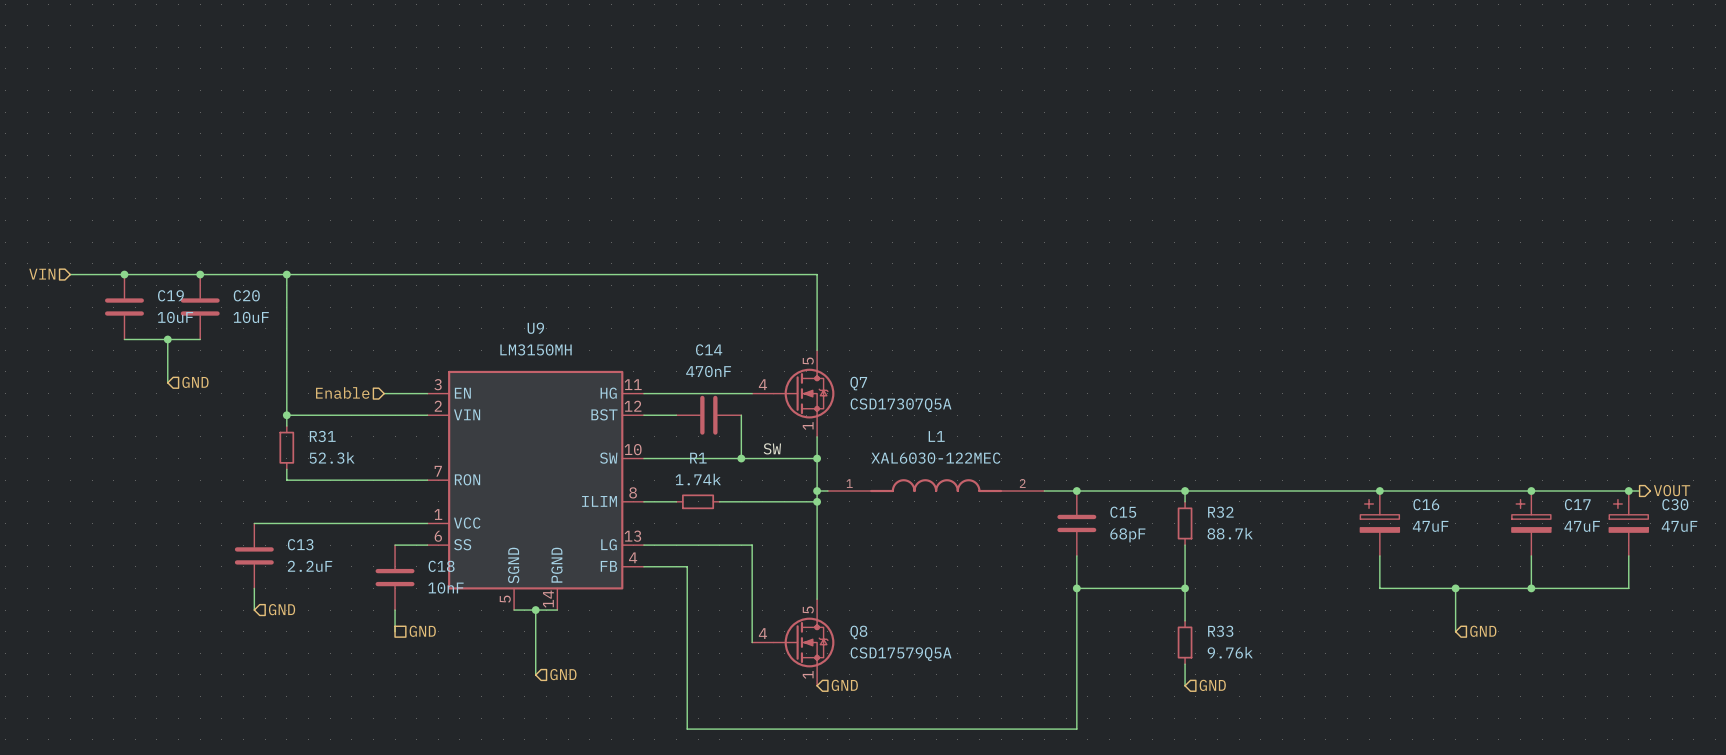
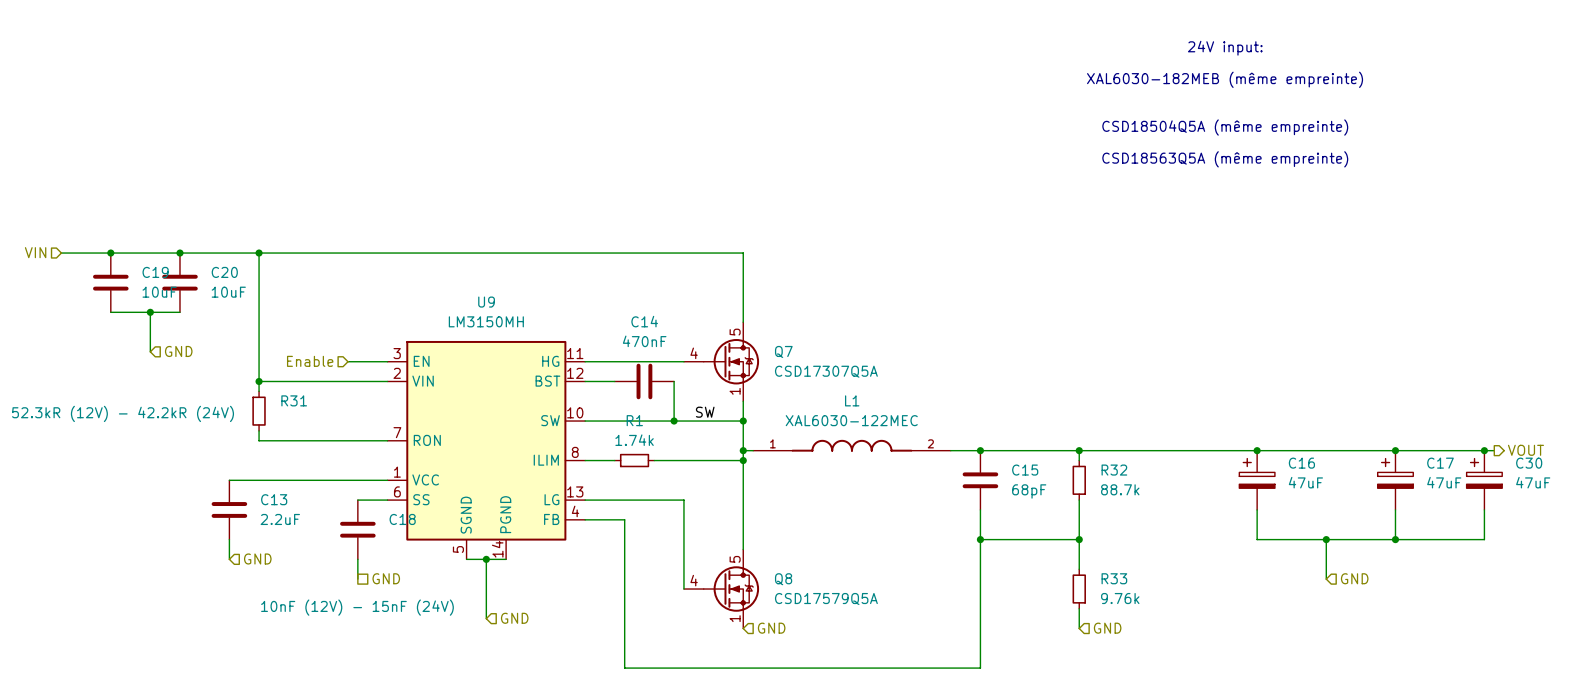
text: none -> 24V input: (1225, 48)
text: none -> XAL6030-182MEB (même empreinte) (1225, 79)
text: none -> CSD18504Q5A (même empreinte) (1225, 127)
text: none -> CSD18563Q5A (même empreinte) (1225, 159)
R31 value: 52.3k (332, 457) -> 52.3kR (12V) - 42.2kR (24V) (123, 413)
C18 value: 10nF (445, 587) -> 10nF (12V) - 15nF (24V) (357, 607)

